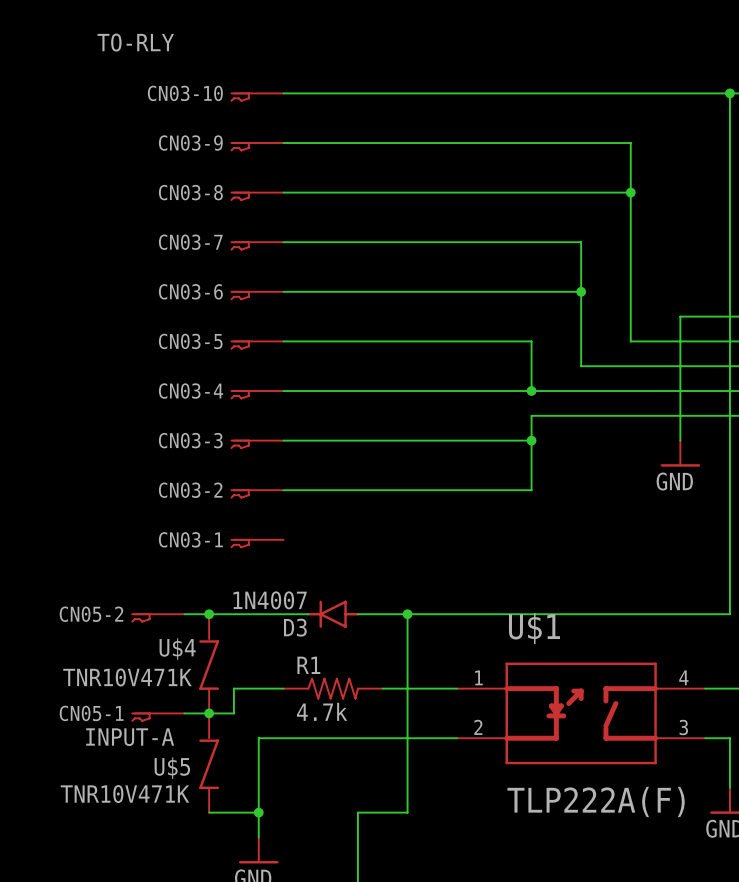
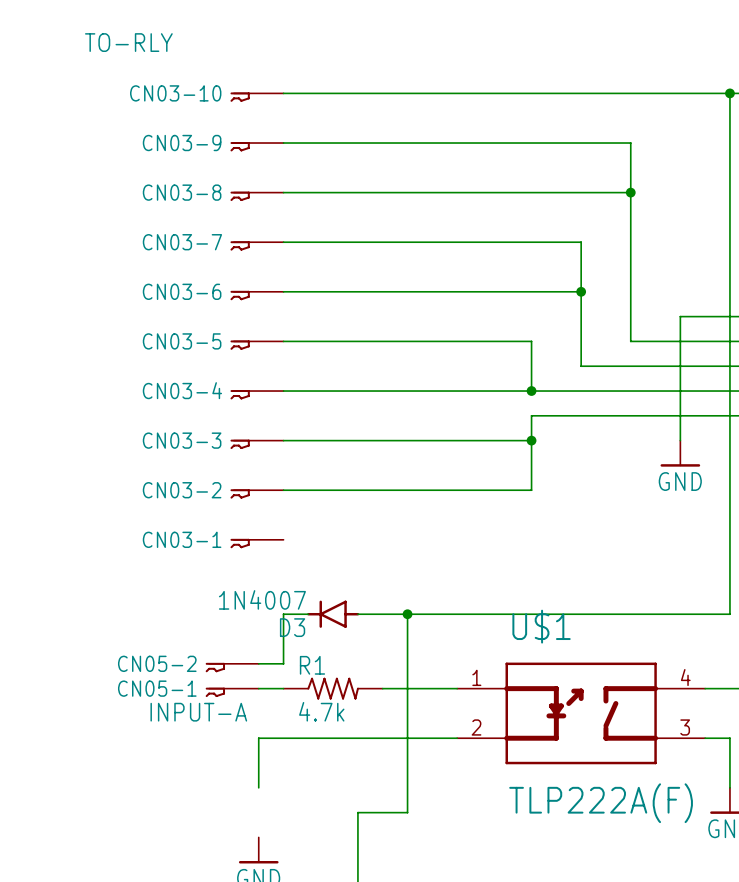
wire: (184, 614) (283, 614) -> (258, 663) (283, 663) (283, 614)
junction: (209, 614) -> none
CN05-2 position: (157, 617) -> (232, 667)
U$4: TNR10V471K (209, 663) -> none
wire: (258, 688) (233, 688) (233, 713) (184, 713) -> none
junction: (209, 713) -> none
CN05-1 position: (157, 717) -> (232, 692)
U$5: TNR10V471K (209, 763) -> none
wire: (258, 787) (258, 837) -> none
wire: (209, 812) (258, 812) -> none
junction: (258, 812) -> none

